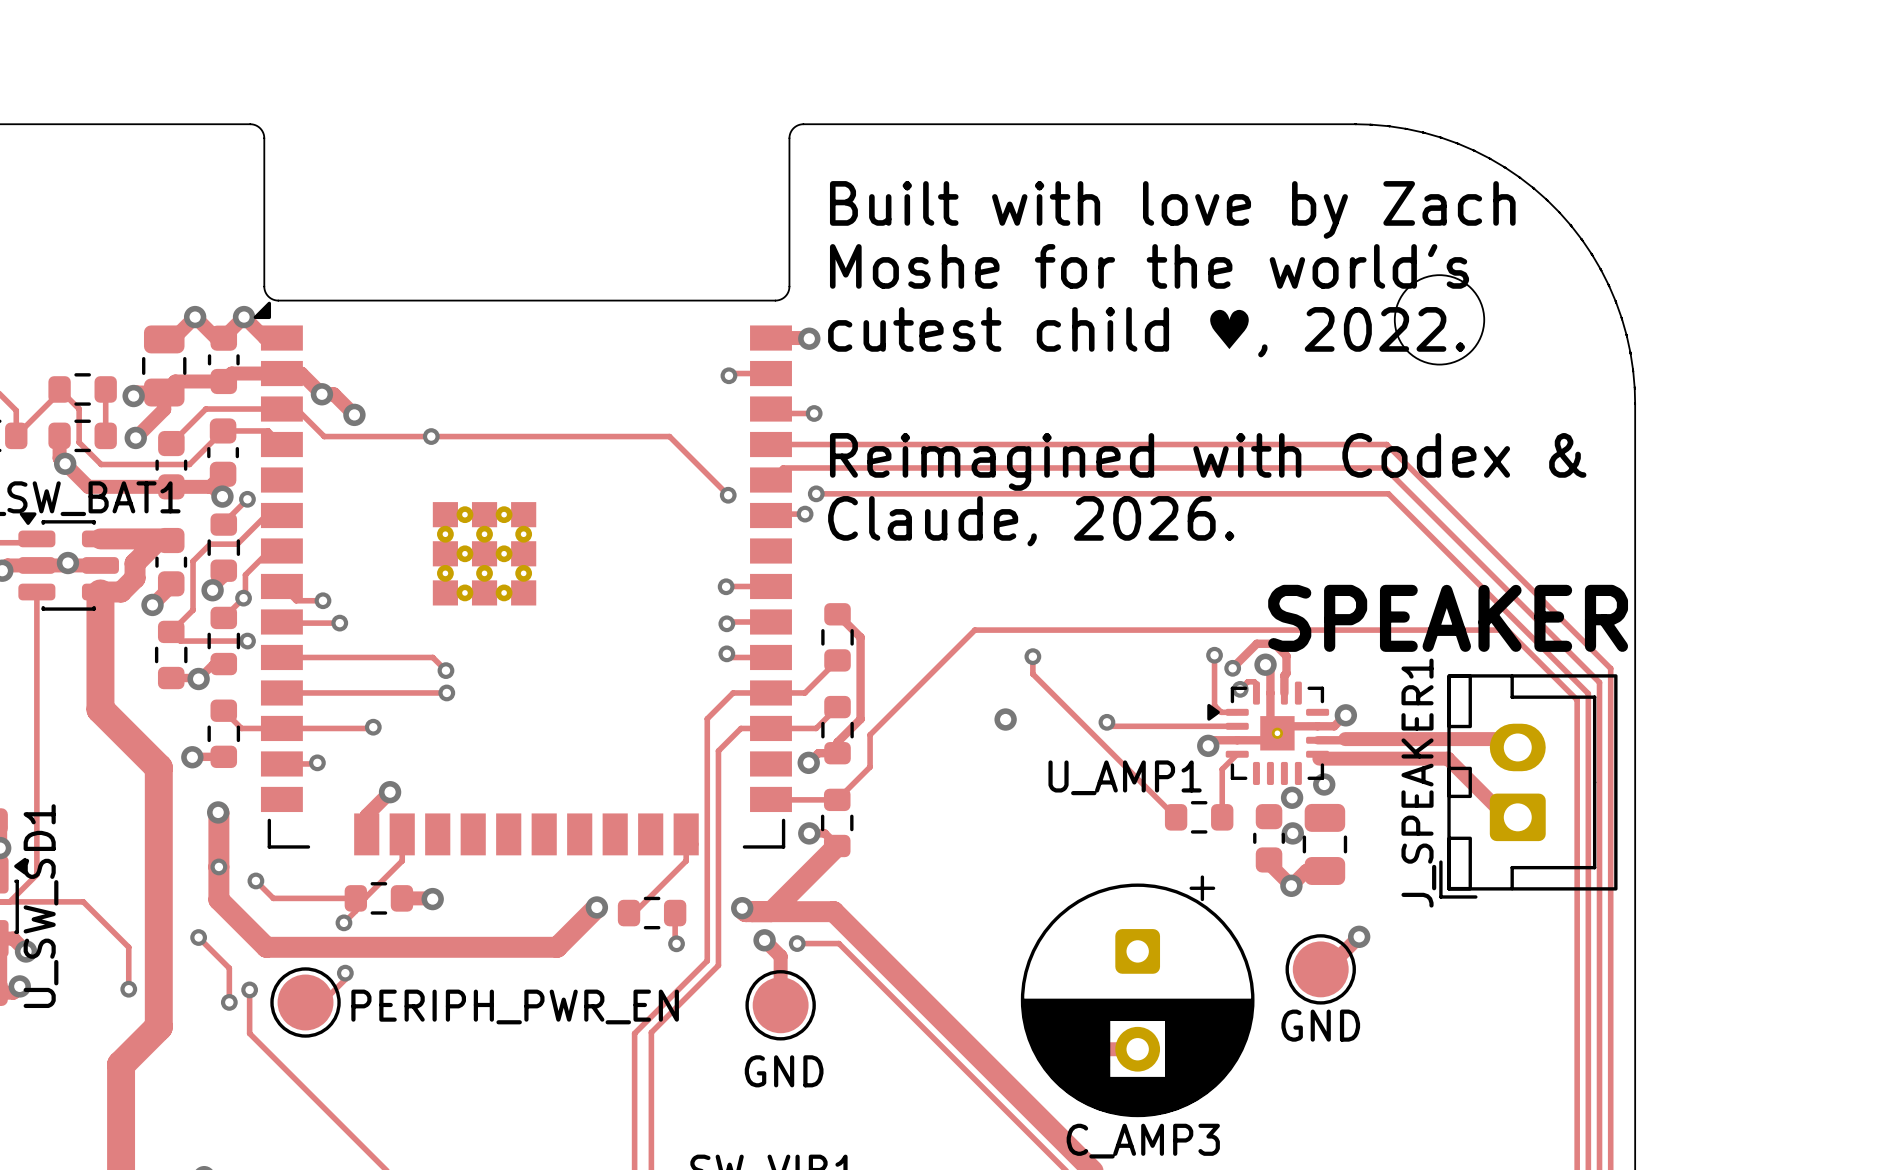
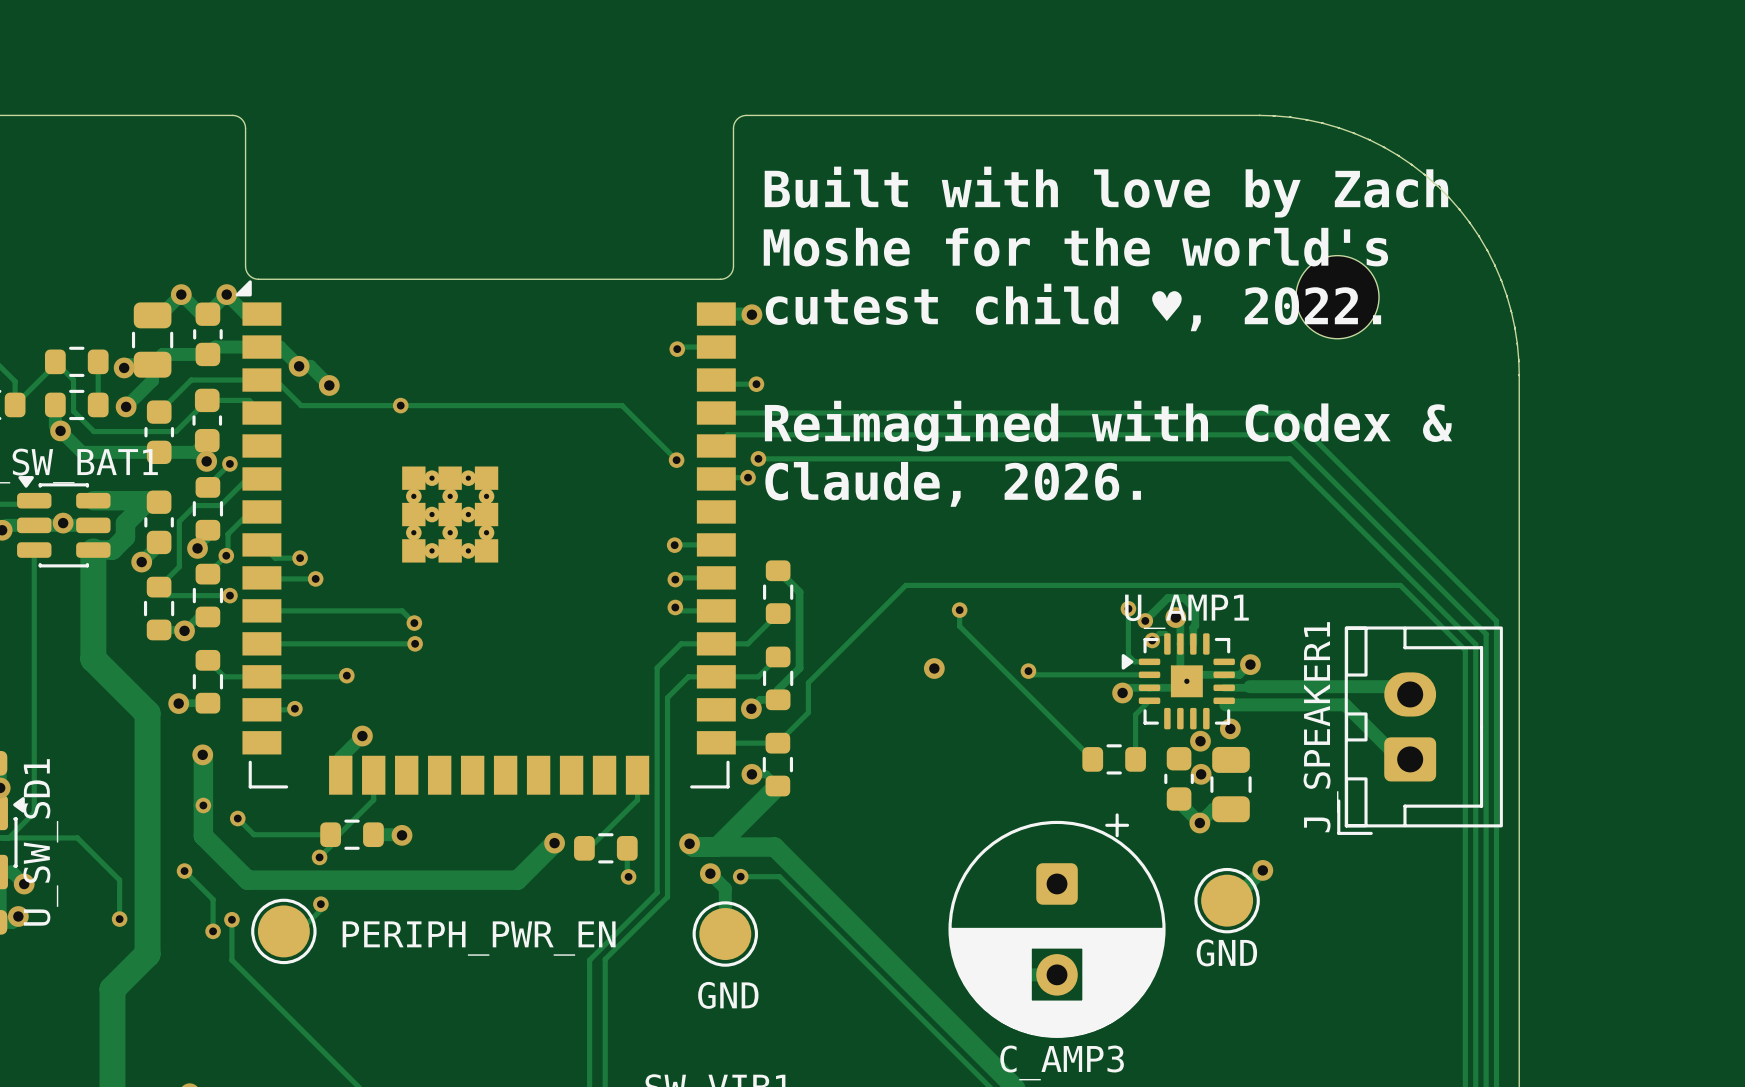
text: SPEAKER (1448, 618) -> none
U_AMP1 name position: U_AMP1 (1125, 777) -> U_AMP1 (1186, 611)

